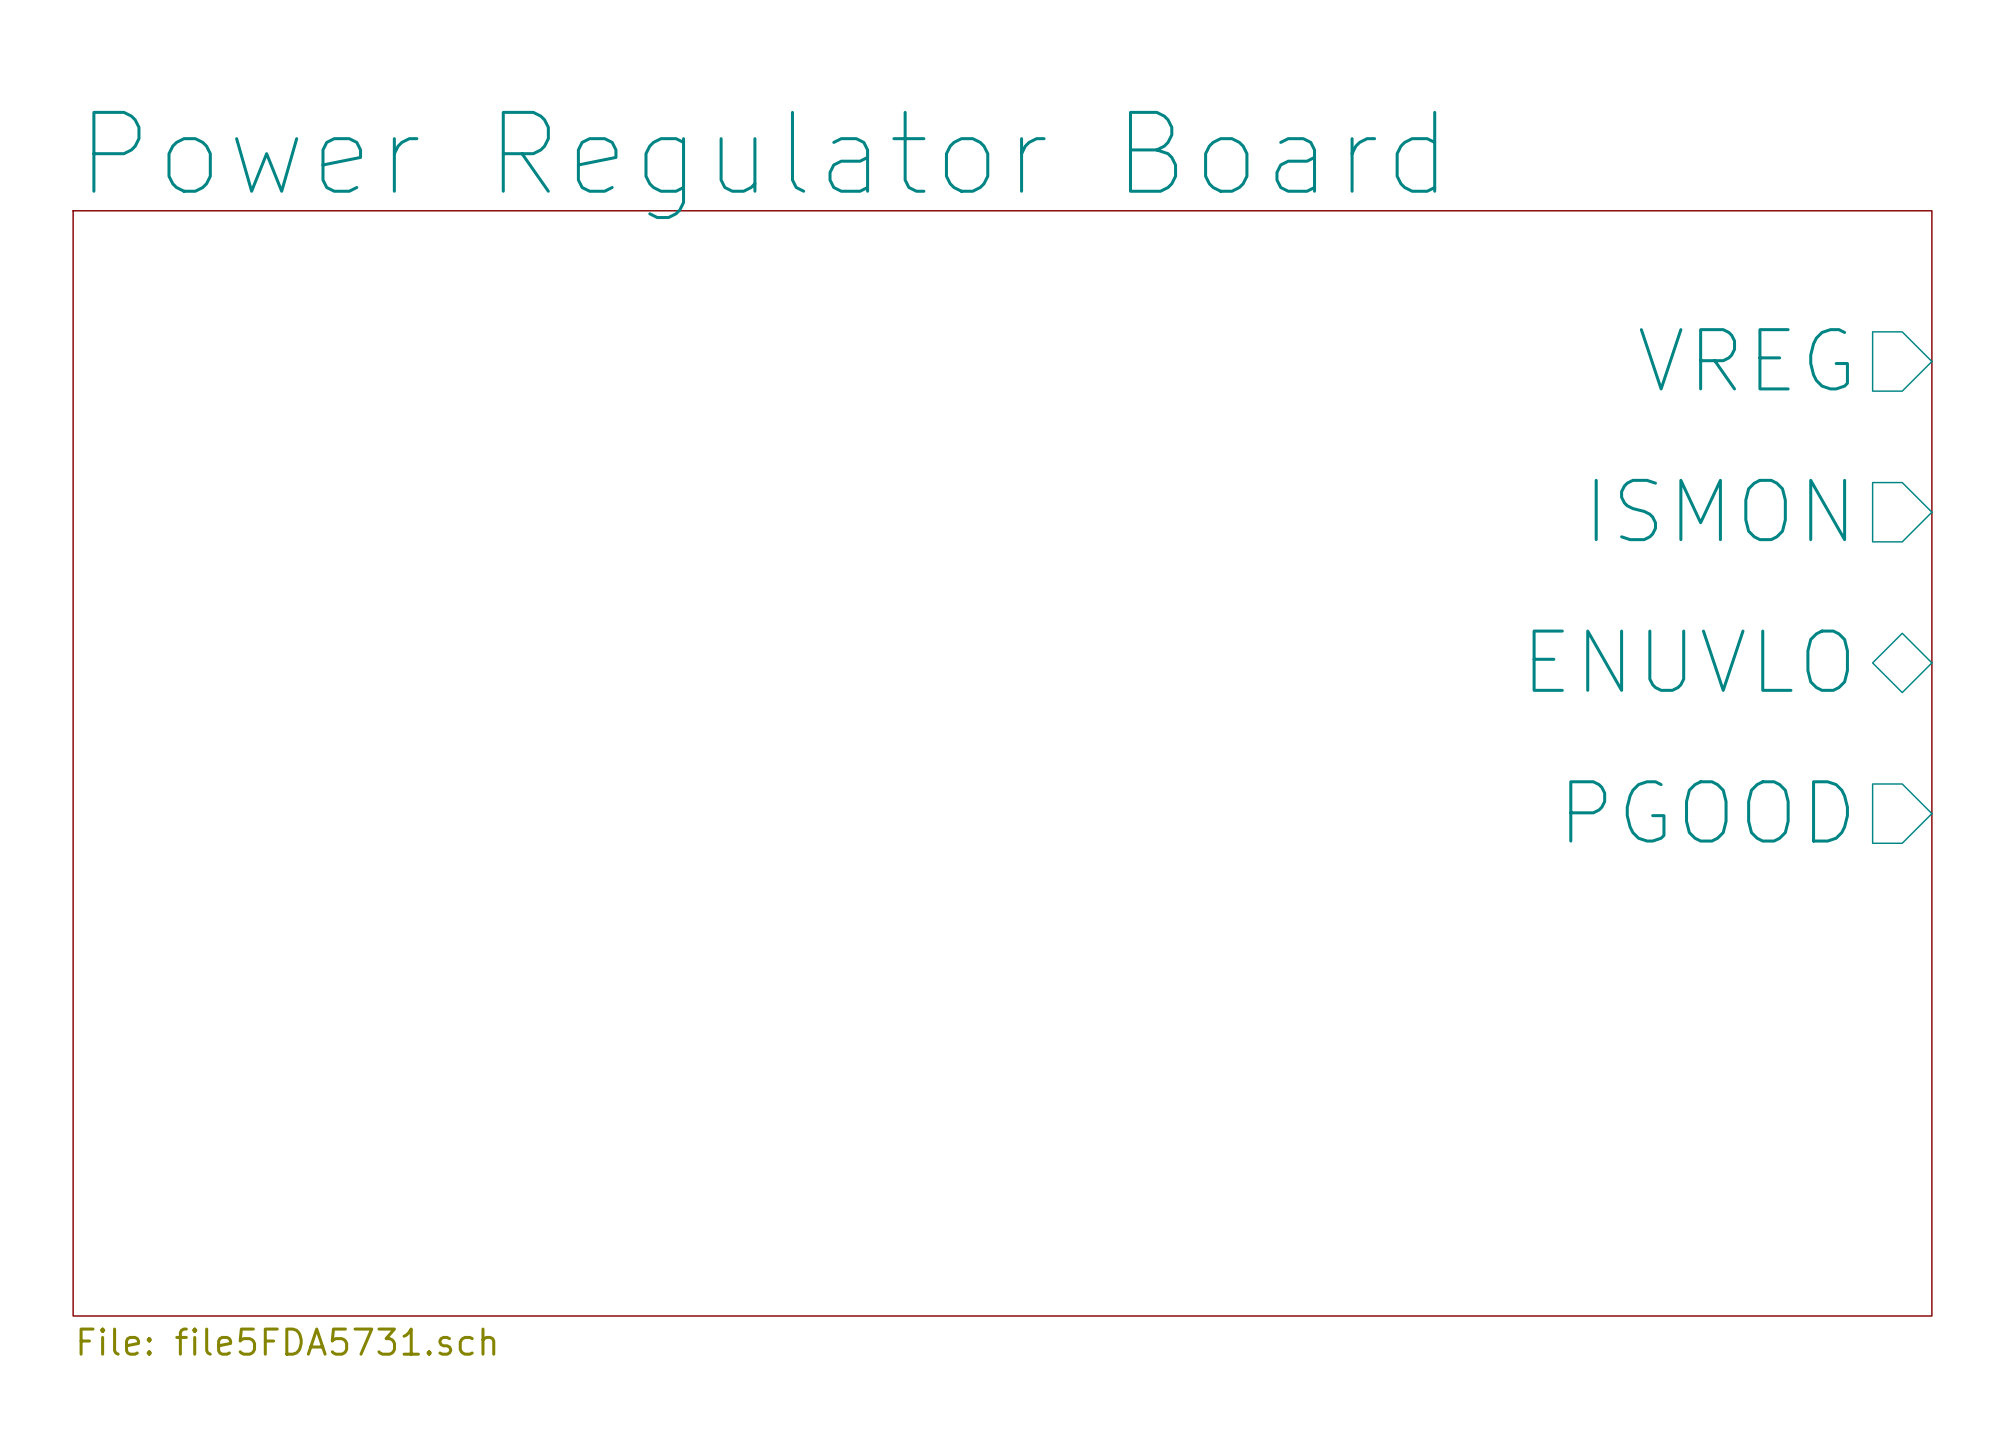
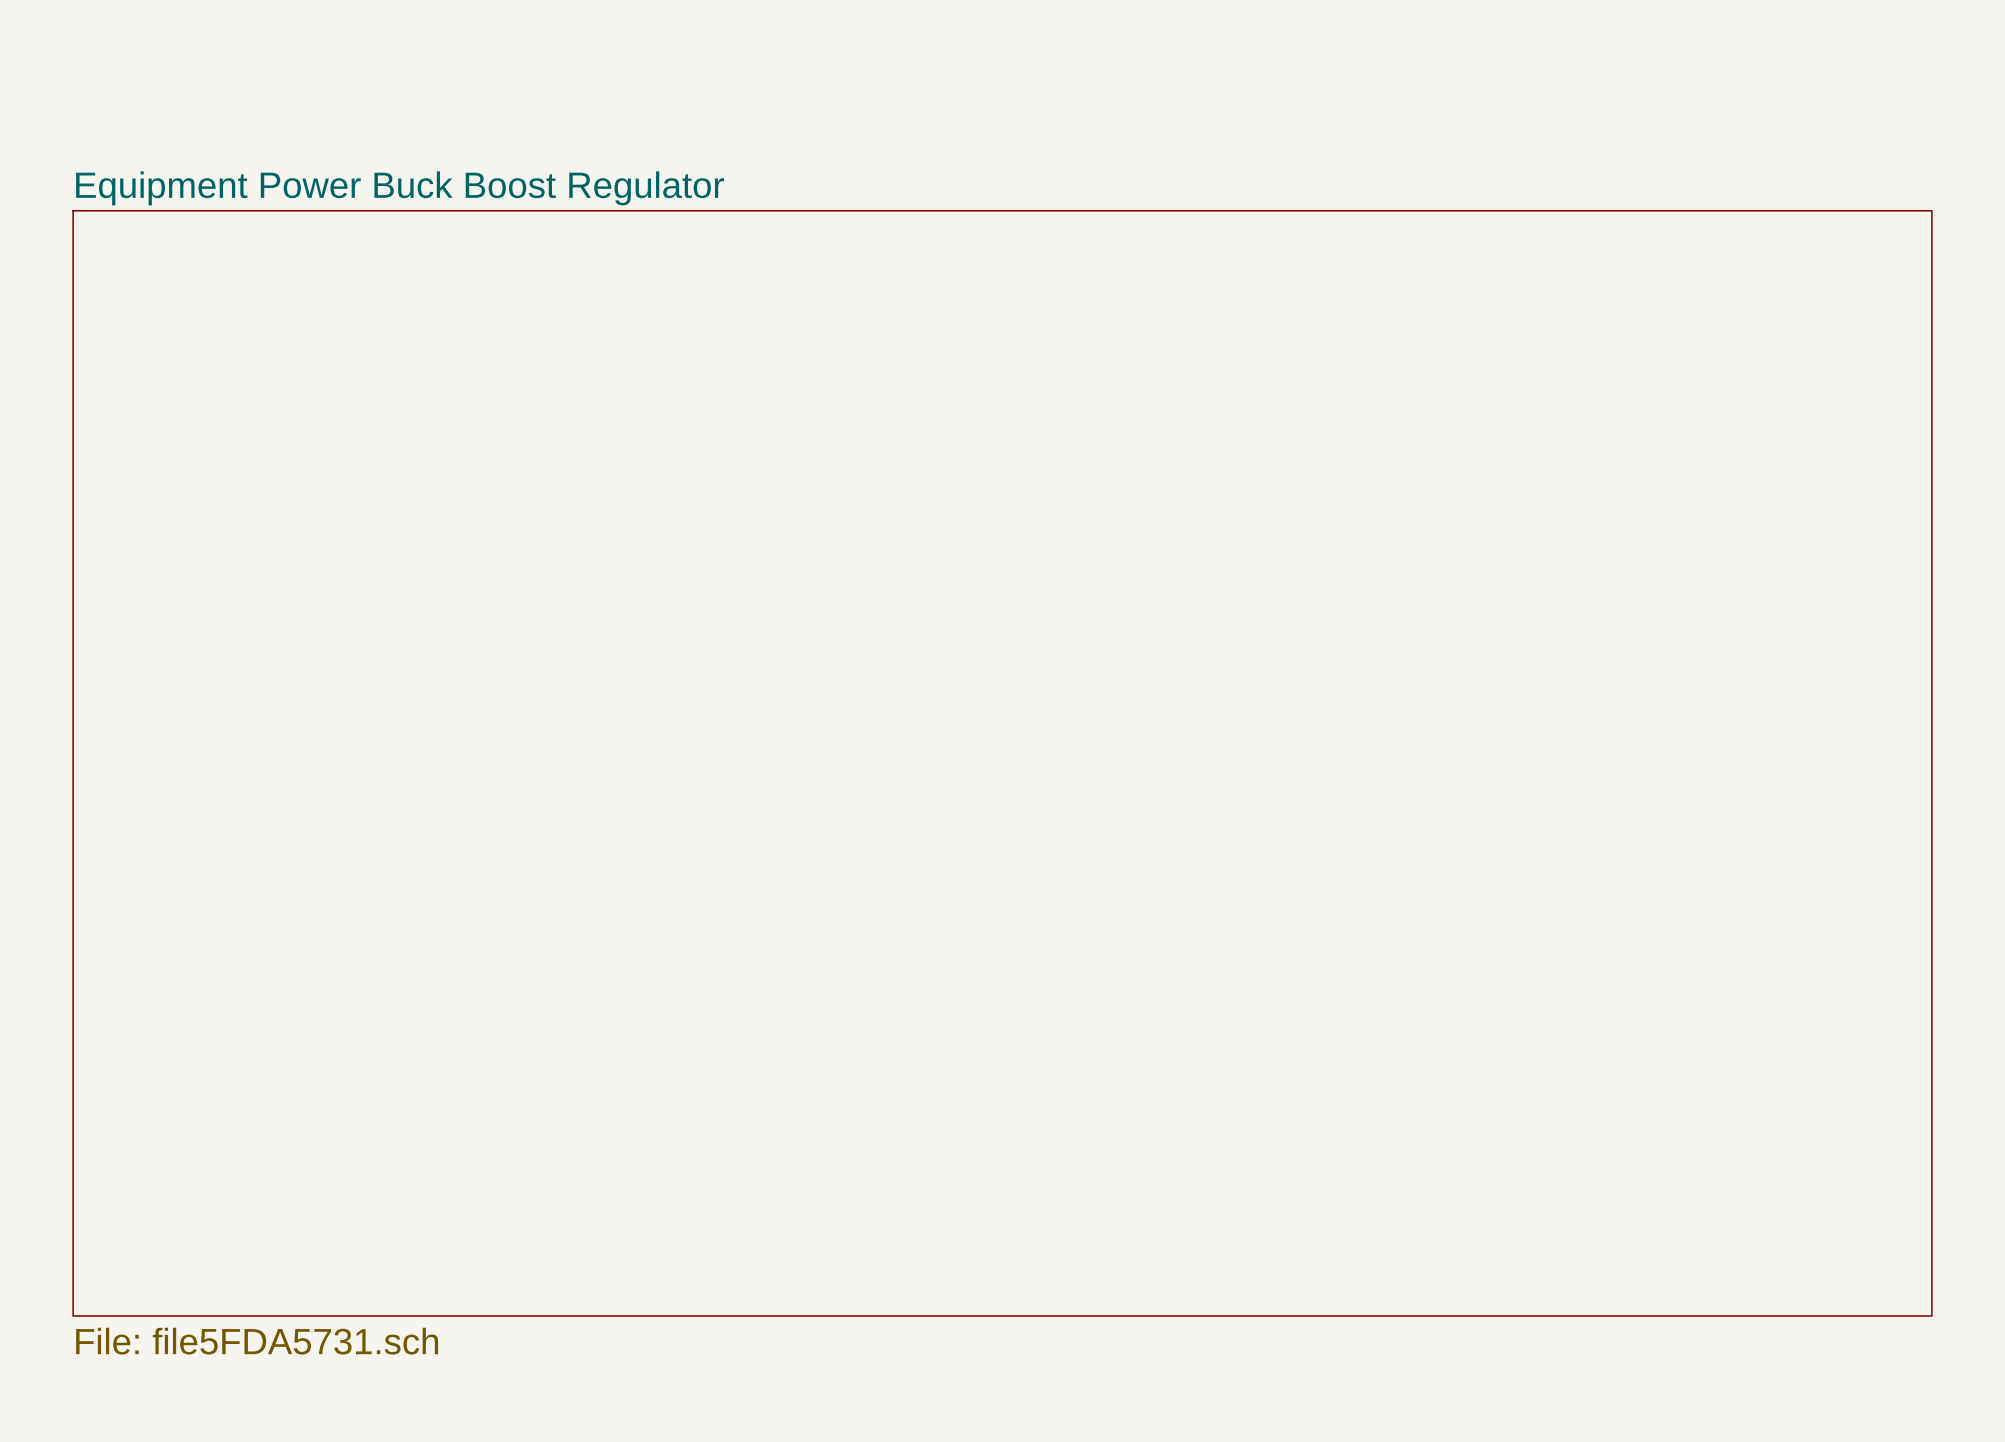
sheet Power Regulator Board name: Power Regulator Board (764, 164) -> Equipment Power Buck Boost Regulator (400, 188)
sheet pin: VREG (1744, 359) -> none
sheet pin: ISMON (1720, 509) -> none
sheet pin: ENUVLO (1690, 660) -> none
sheet pin: PGOOD (1709, 811) -> none

